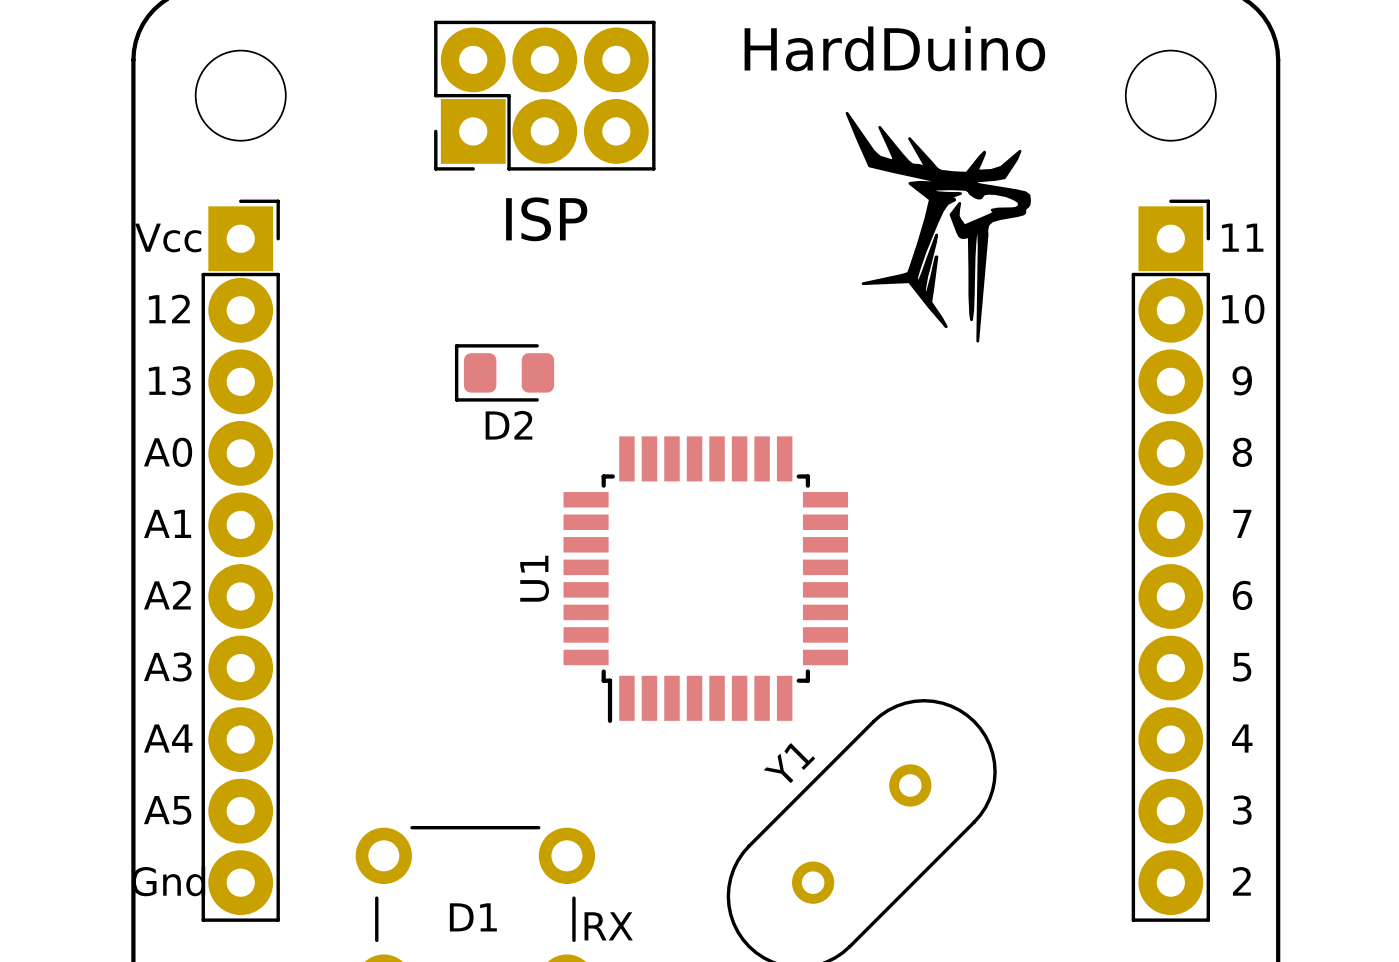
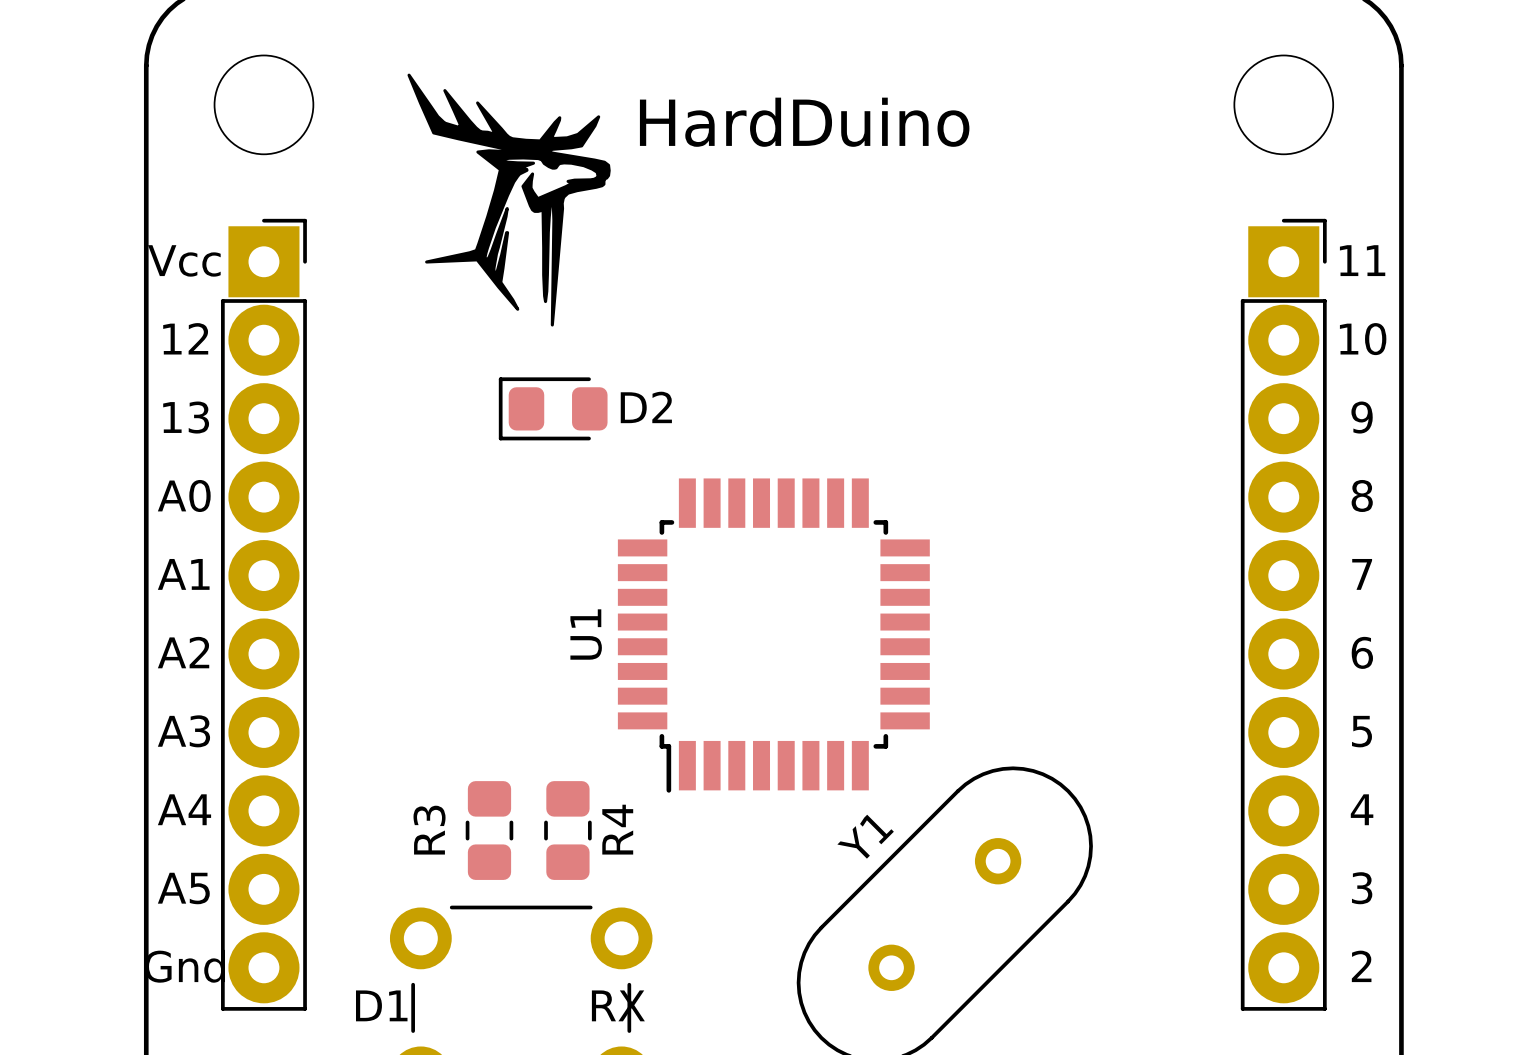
text position: HardDuino (894, 48) -> HardDuino (804, 122)
part: (544, 95) -> none
text: ISP (546, 219) -> none
drawing position: (938, 227) -> (509, 200)
D2 name position: D2 (508, 425) -> D2 (646, 407)
R3: none -> (489, 830)
R4: none -> (567, 830)
D1 name position: D1 (473, 917) -> D1 (381, 1005)
text position: RX (608, 926) -> RX (618, 1005)

